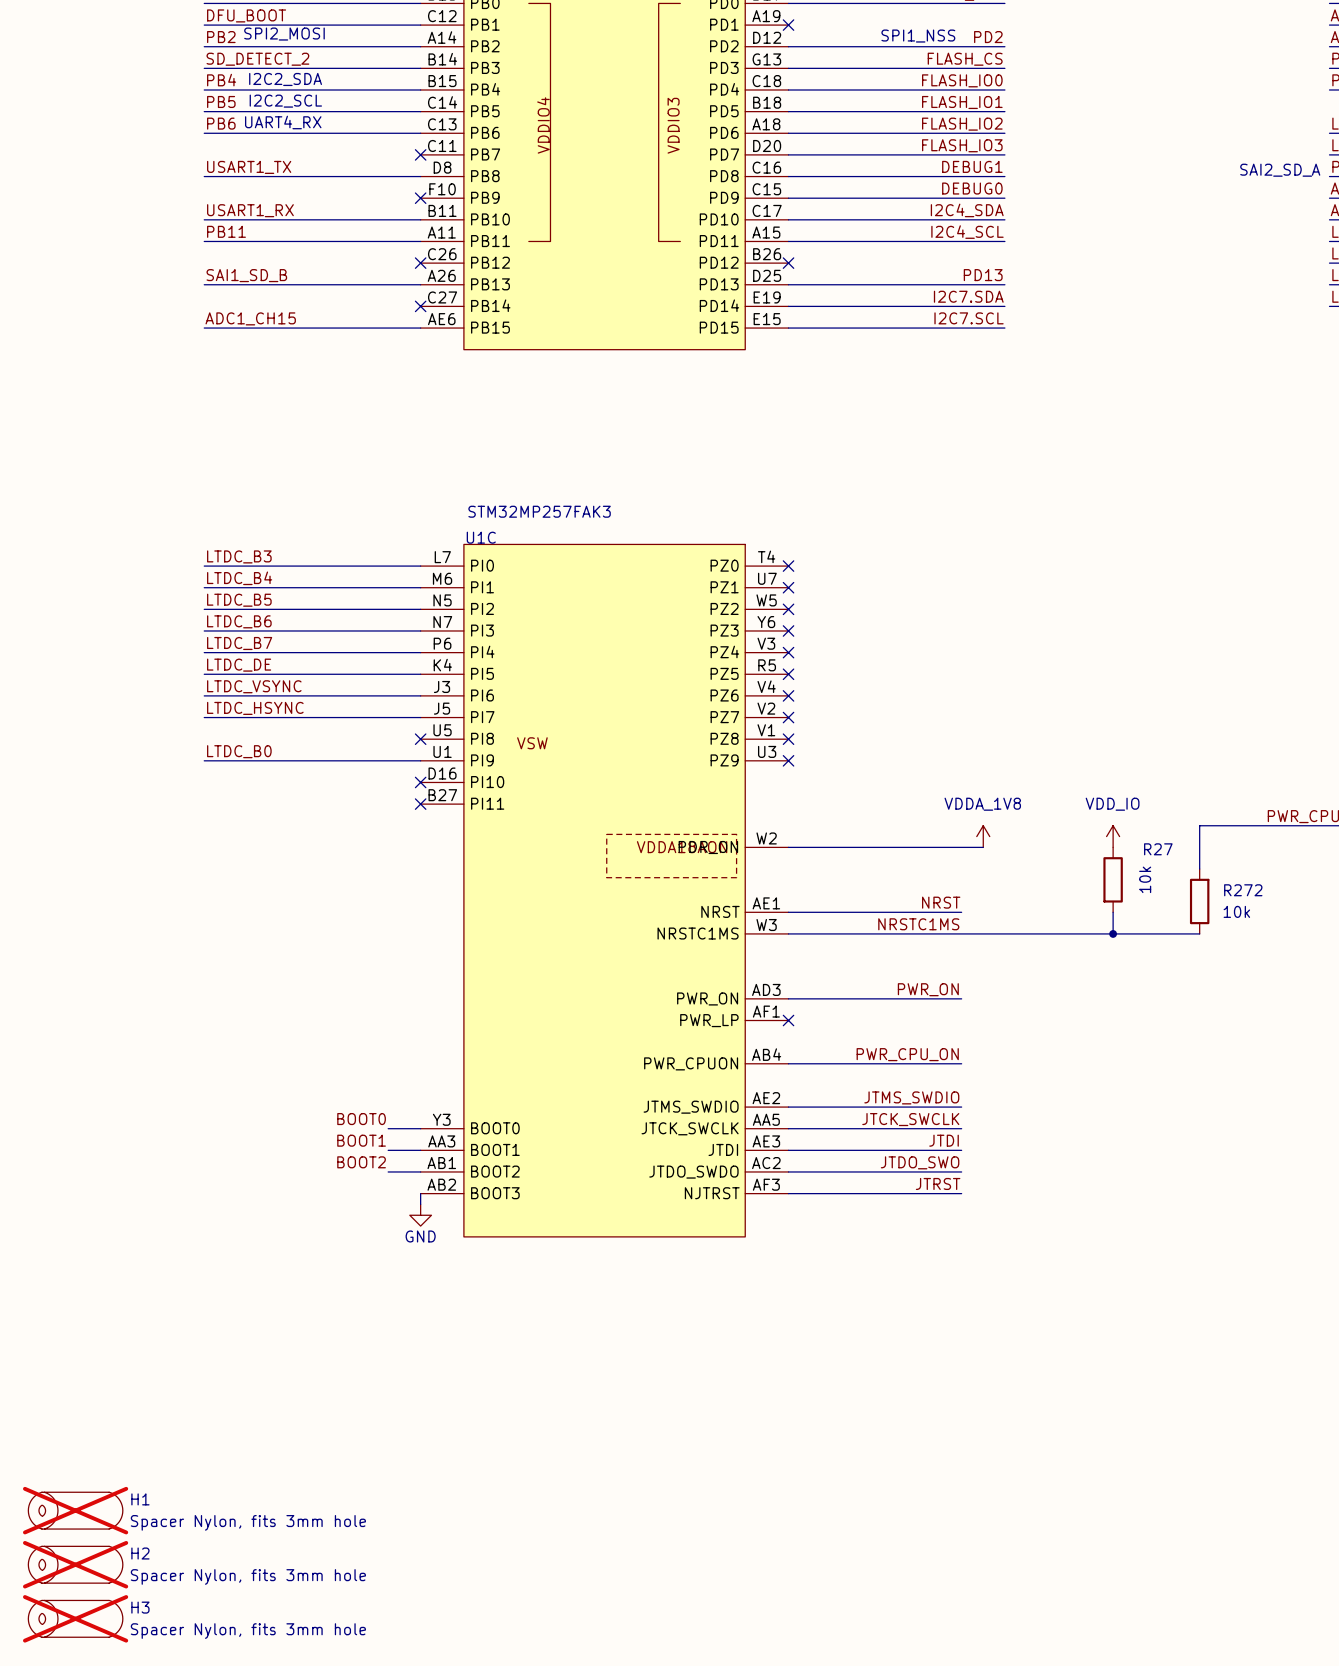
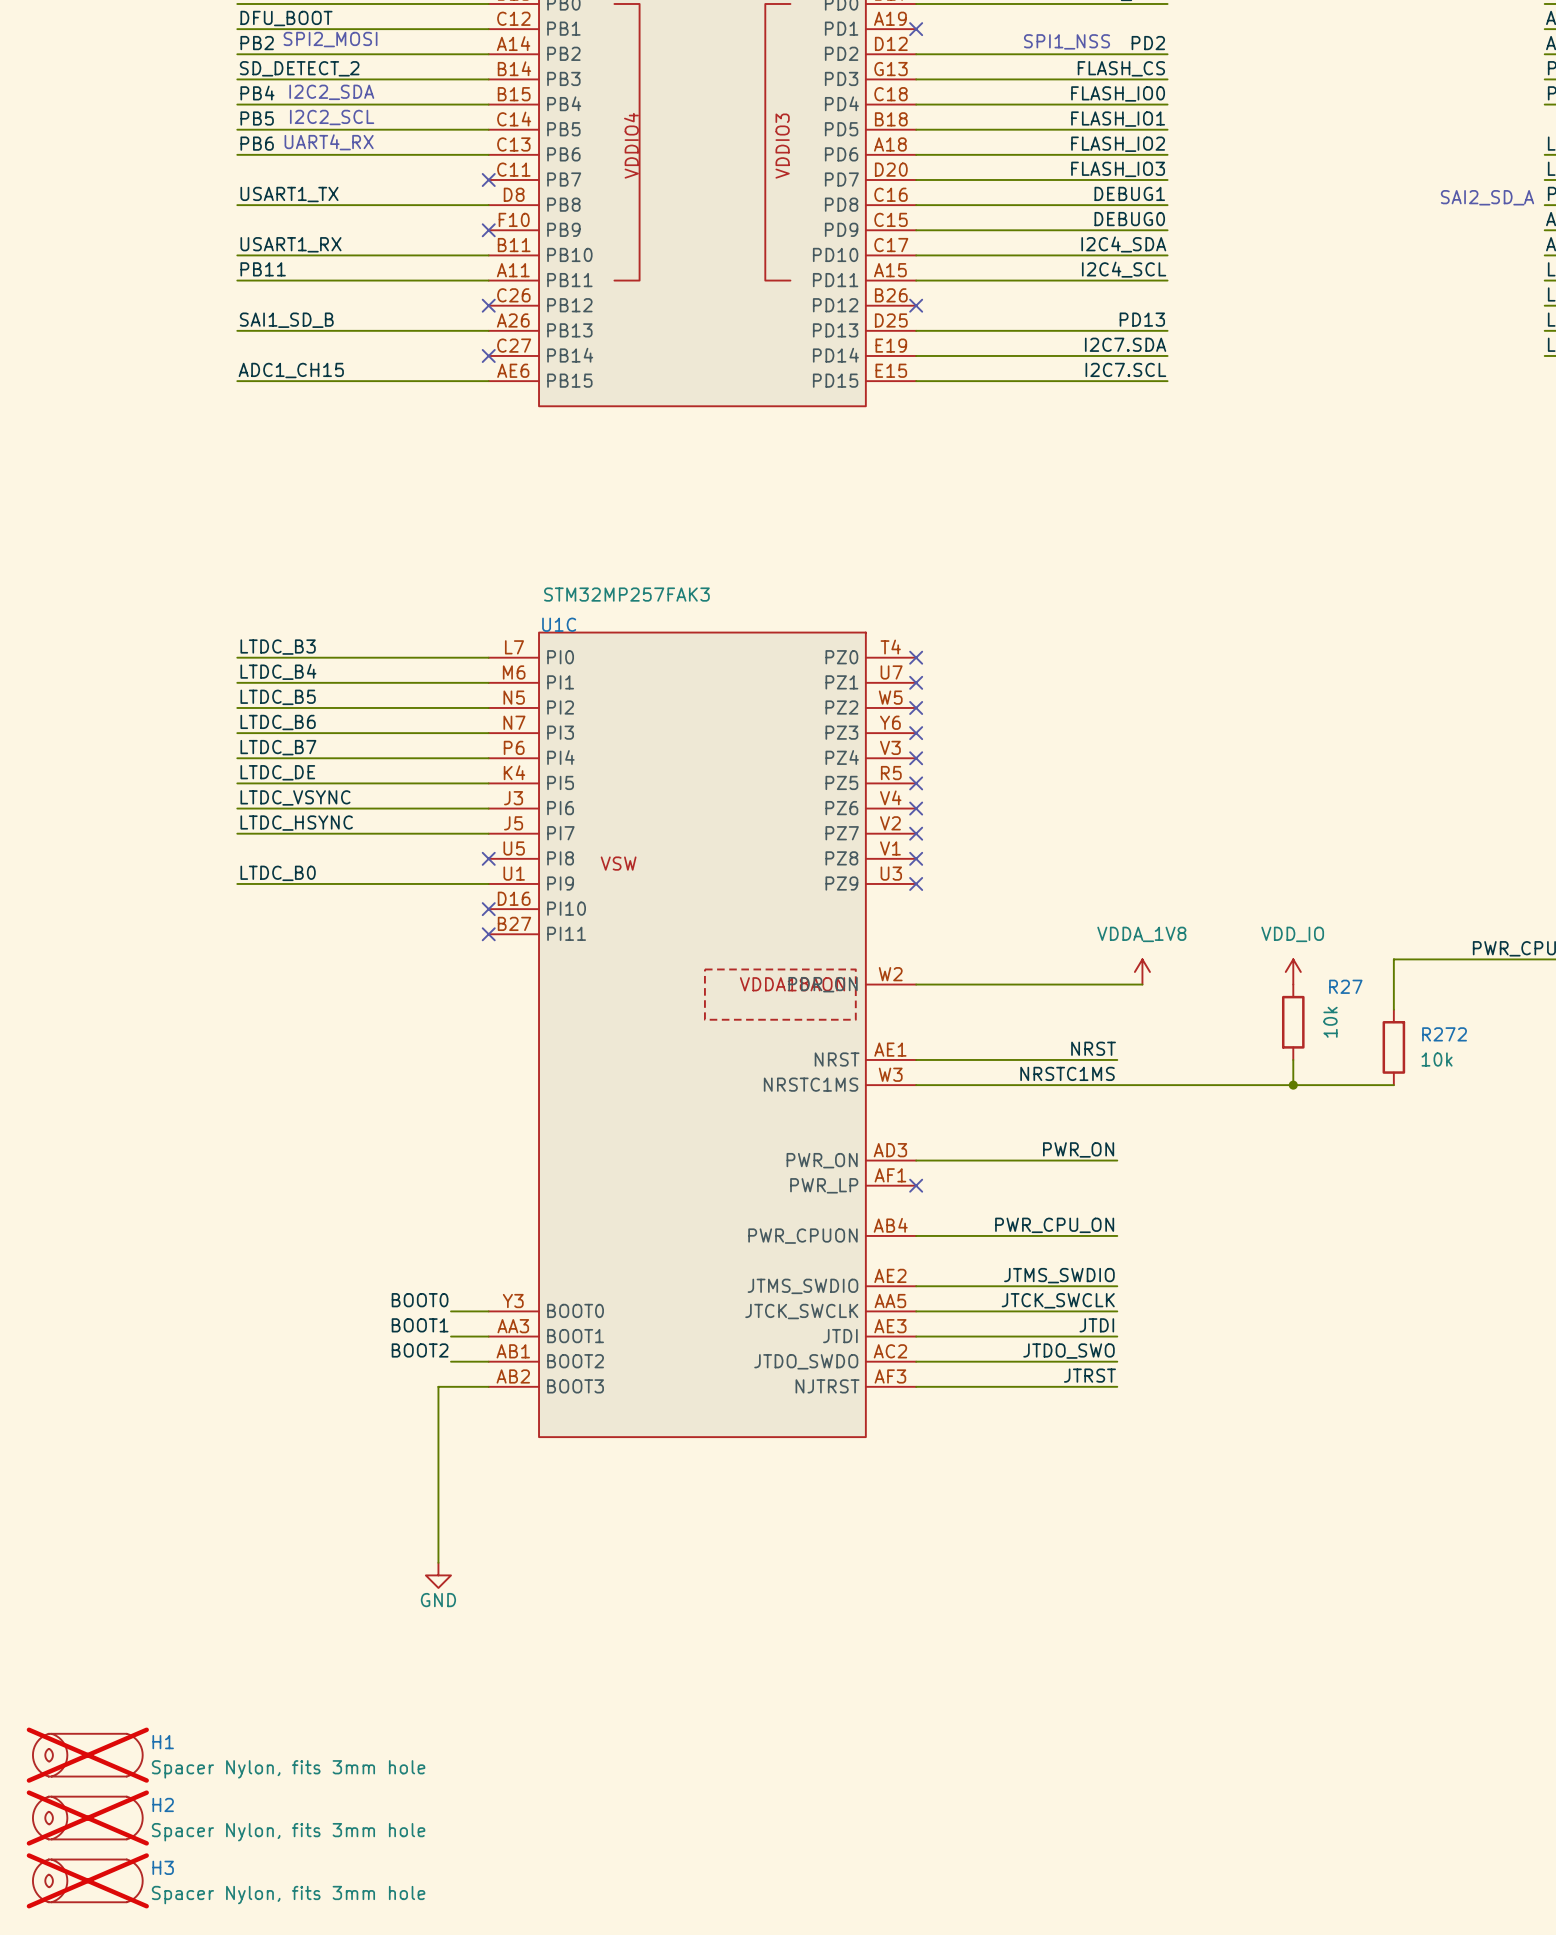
wire: (420, 1193) (420, 1204) -> (488, 1386) (438, 1386) (438, 1562)
power symbol position: GND (420, 1215) -> GND (438, 1575)

